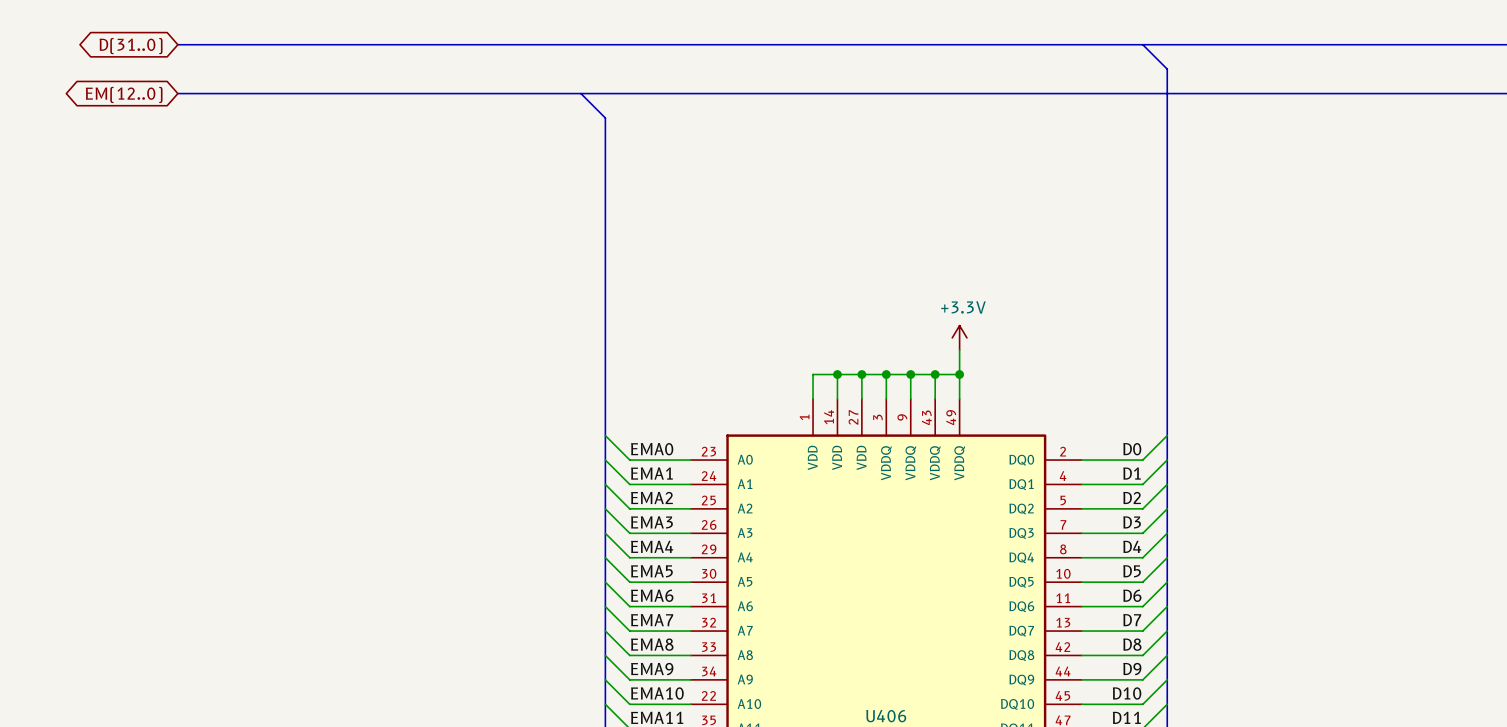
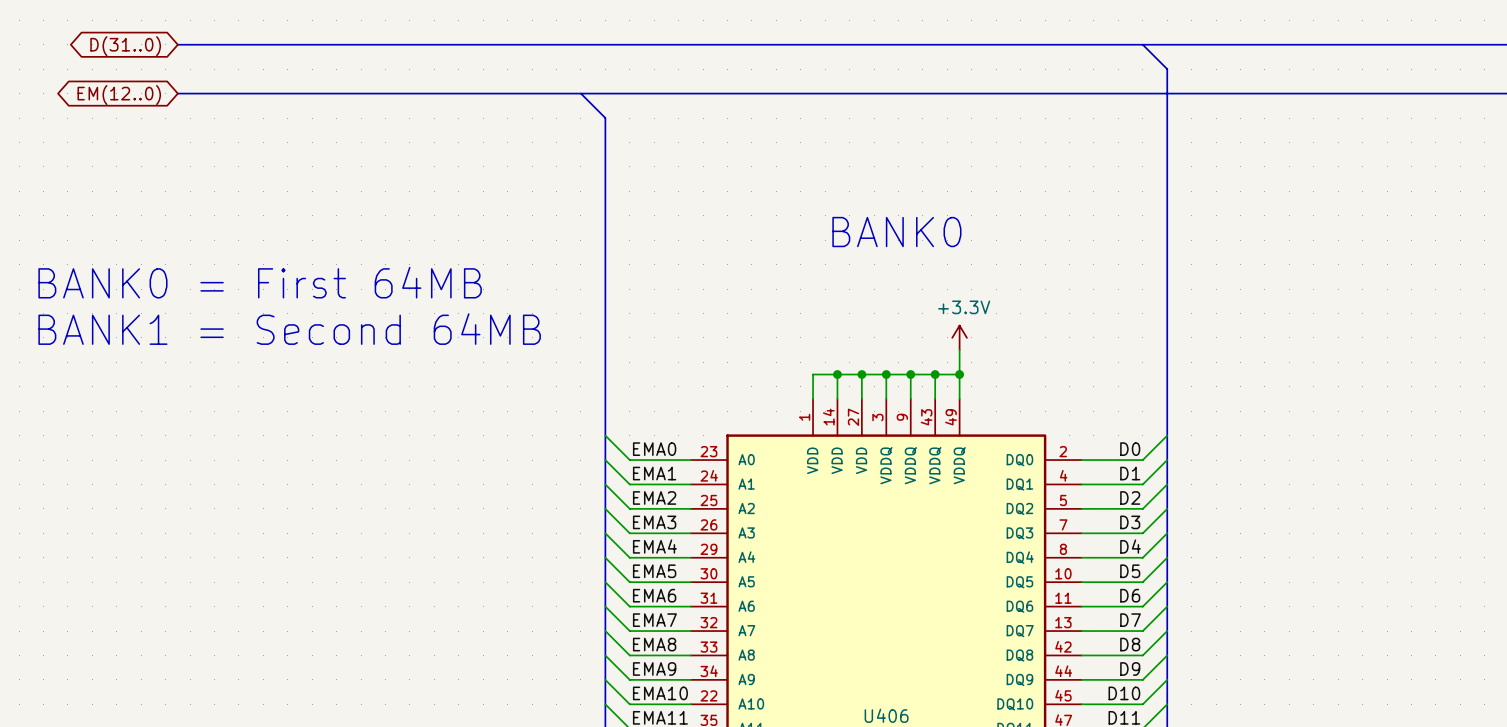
text: none -> BANK0 (896, 232)
text: none -> BANK0 = First 64MB (260, 282)
text: none -> BANK1 = Second 64MB (289, 329)

